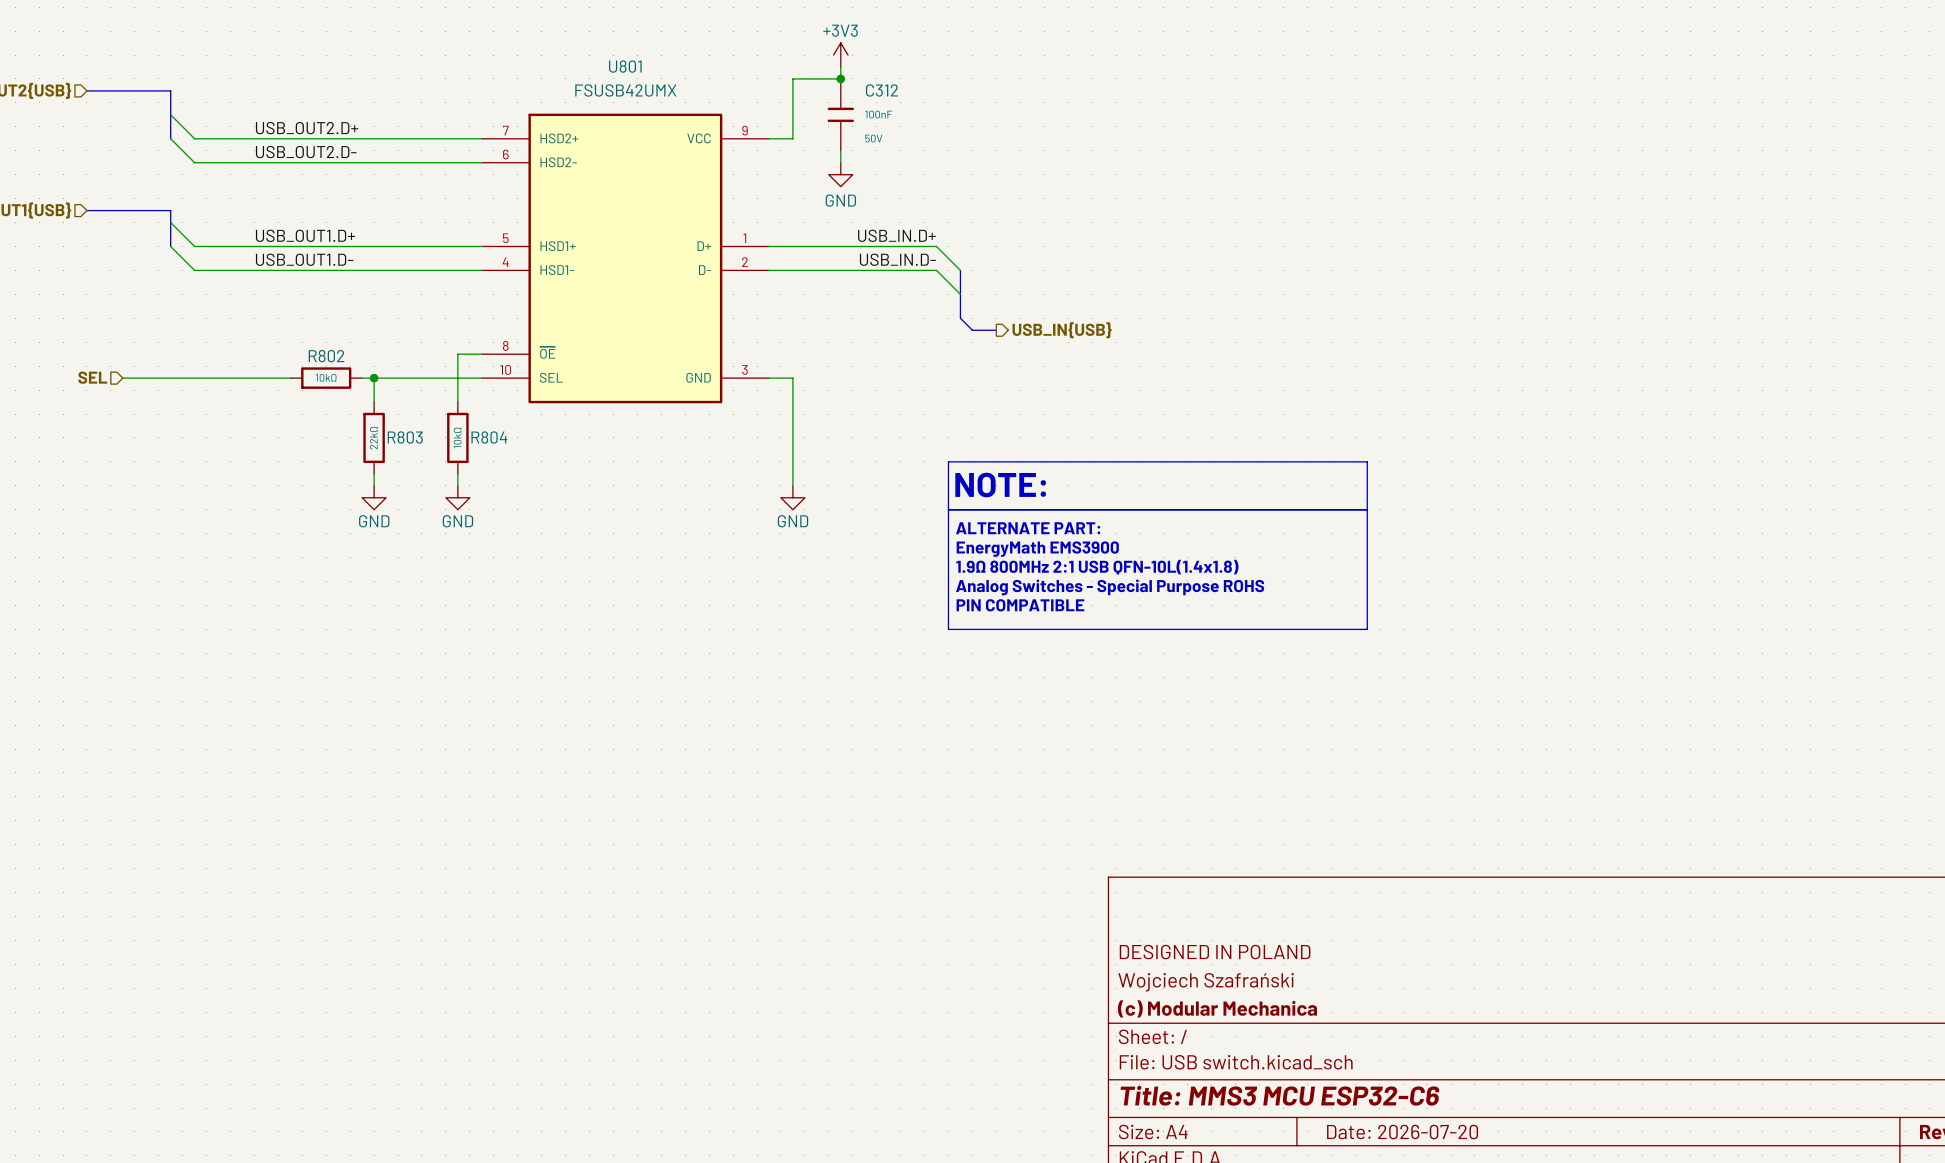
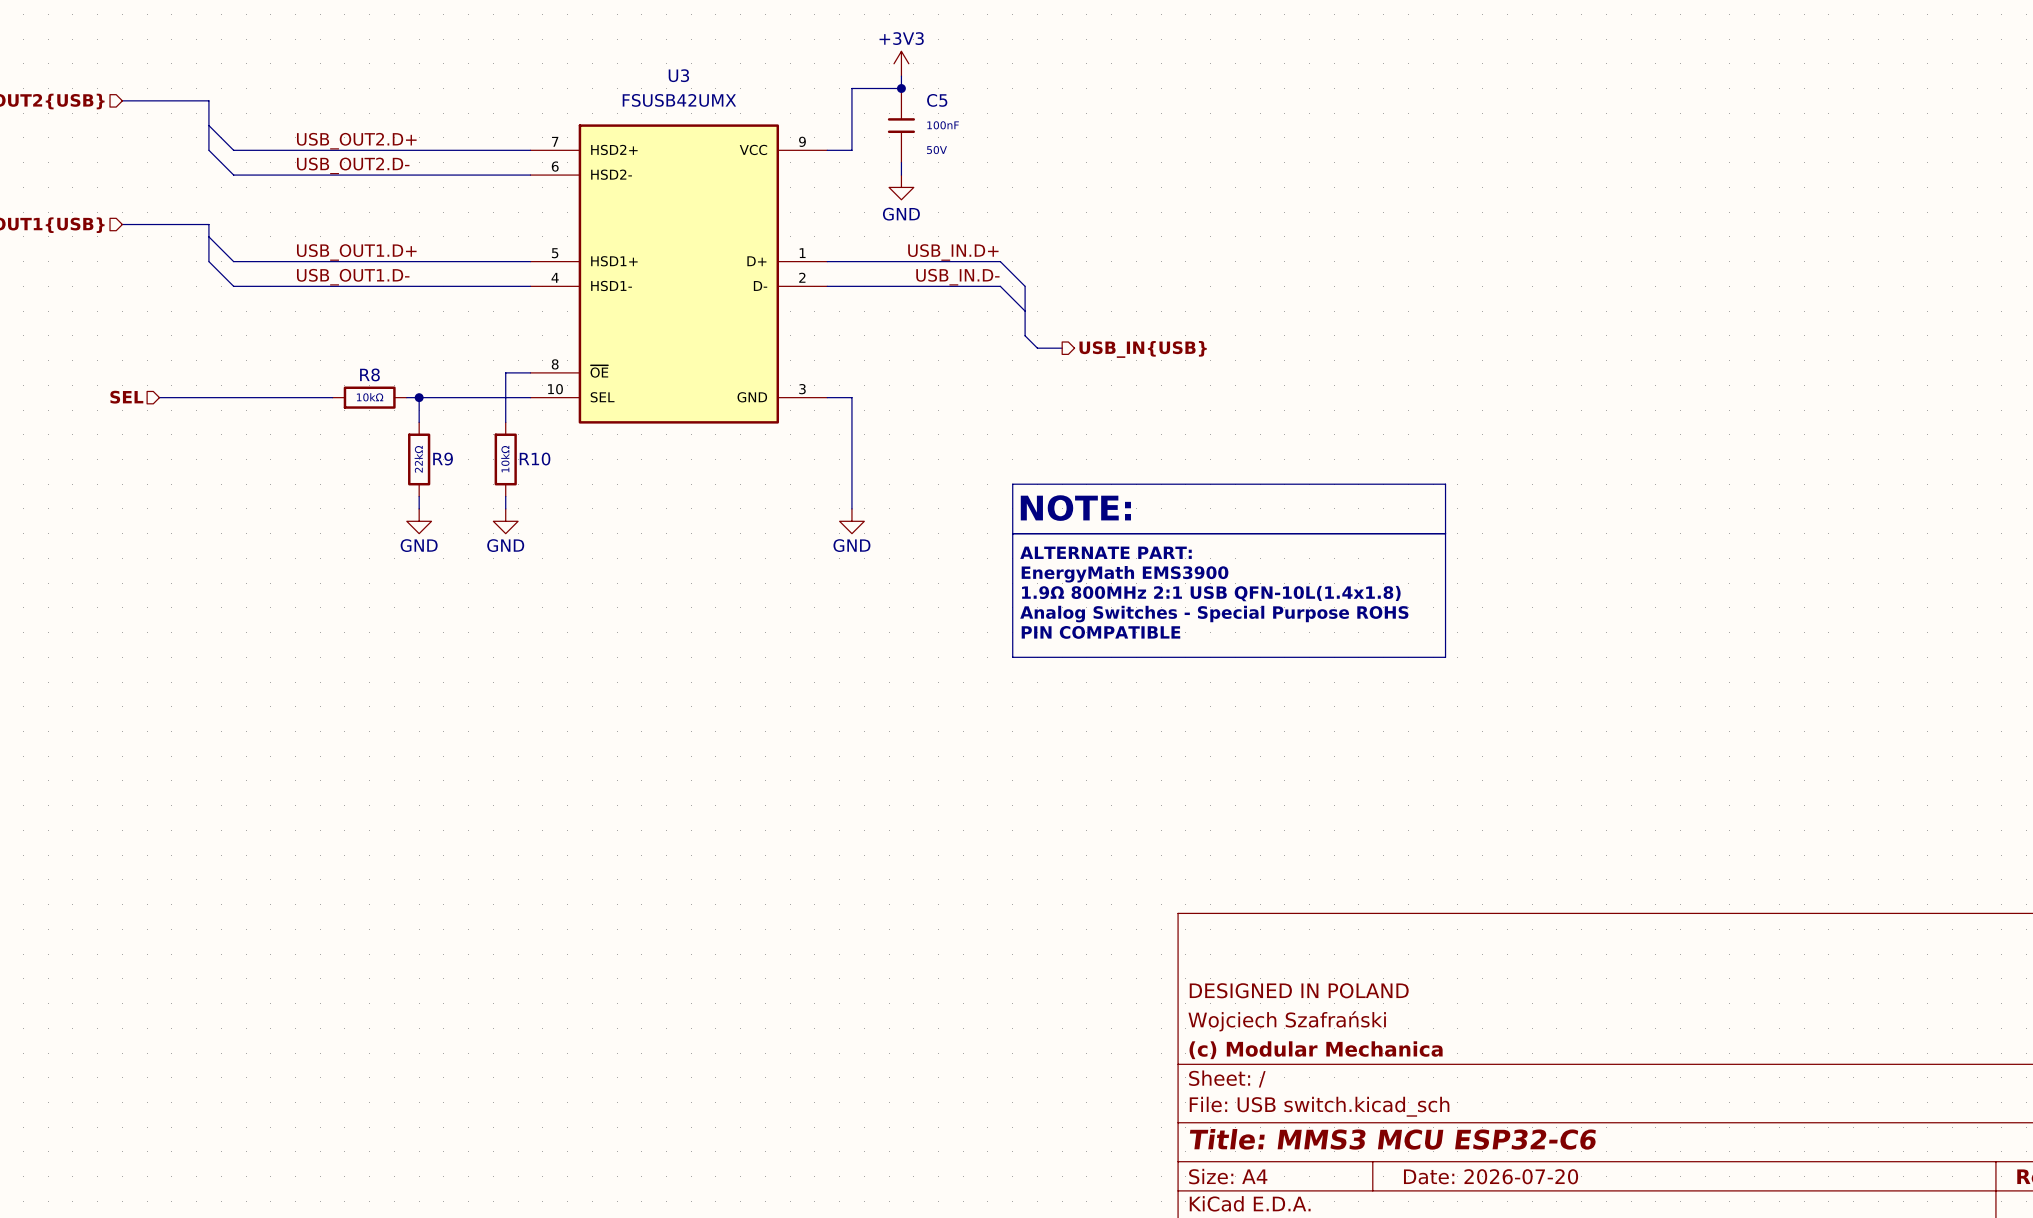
U801 name: U801 (625, 66) -> U3 (678, 75)
C312 name: C312 (882, 90) -> C5 (937, 100)
R802 name: R802 (326, 356) -> R8 (369, 374)
R803 name: R803 (405, 437) -> R9 (443, 459)
R804 name: R804 (489, 437) -> R10 (535, 459)

